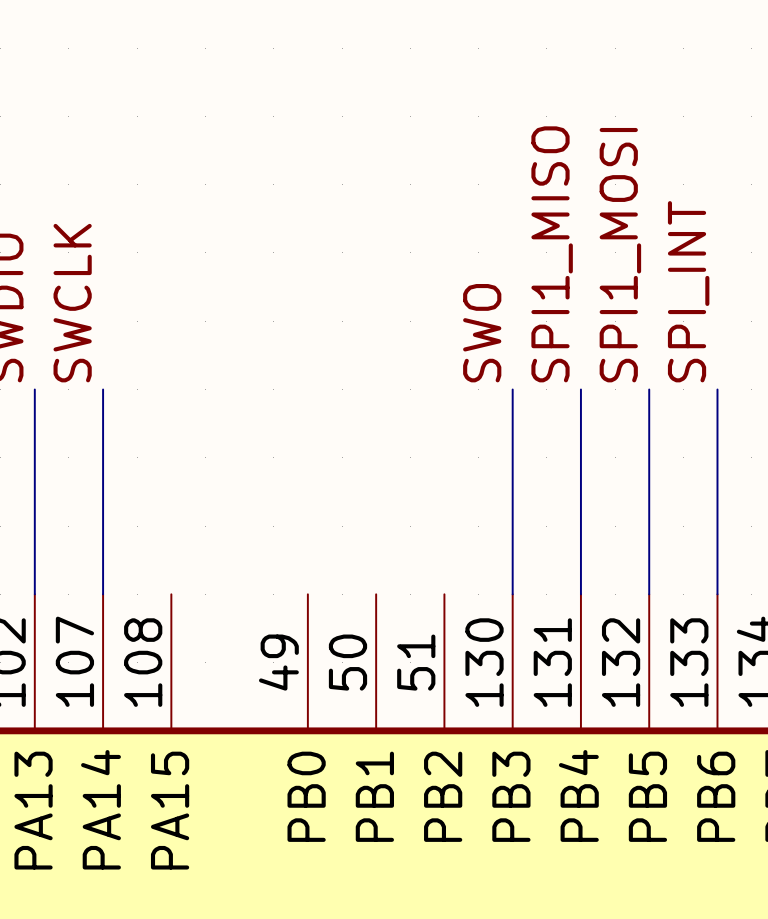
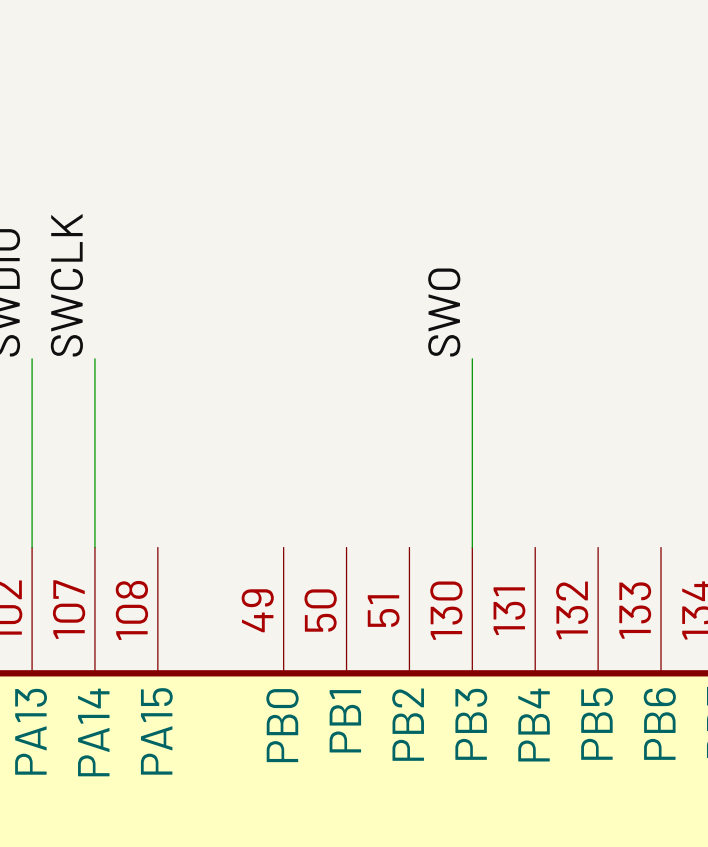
label: SPI1_MISO (552, 254) -> none
label: SPI1_MOSI (620, 255) -> none
label: SPI_INT (688, 291) -> none
wire: (580, 389) (580, 594) -> none
wire: (649, 389) (649, 594) -> none
wire: (717, 389) (717, 594) -> none

